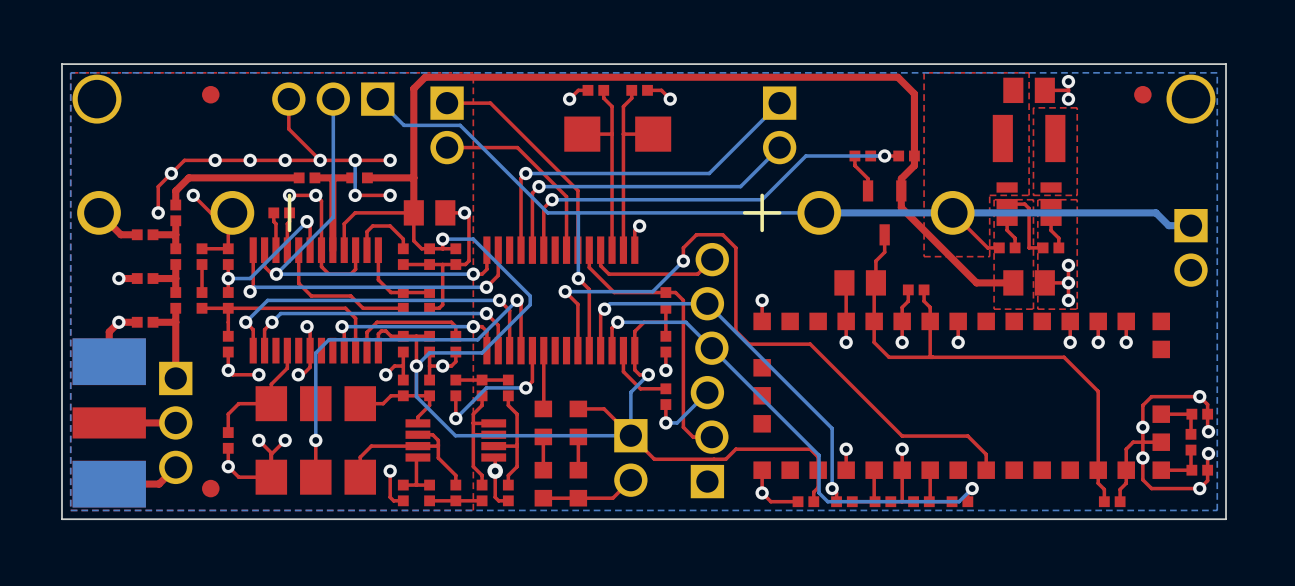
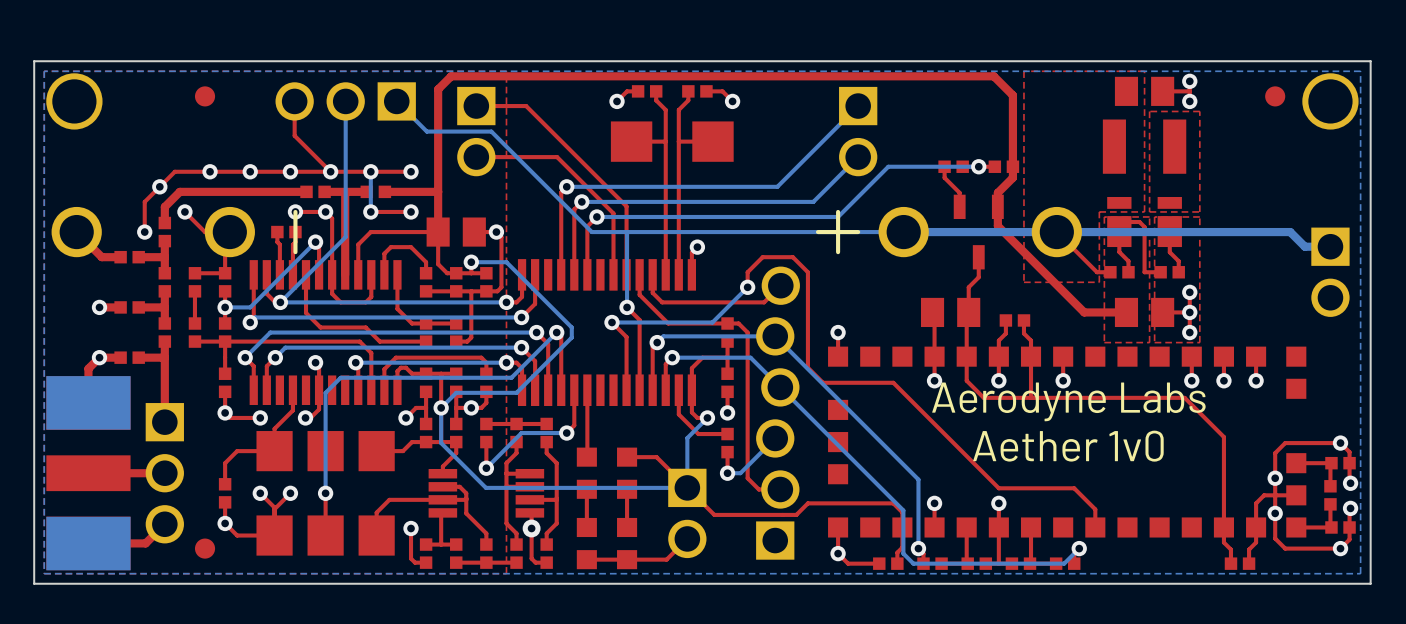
text: none -> Aerodyne Labs (1068, 401)
text: none -> Aether 1v0 (1068, 446)

